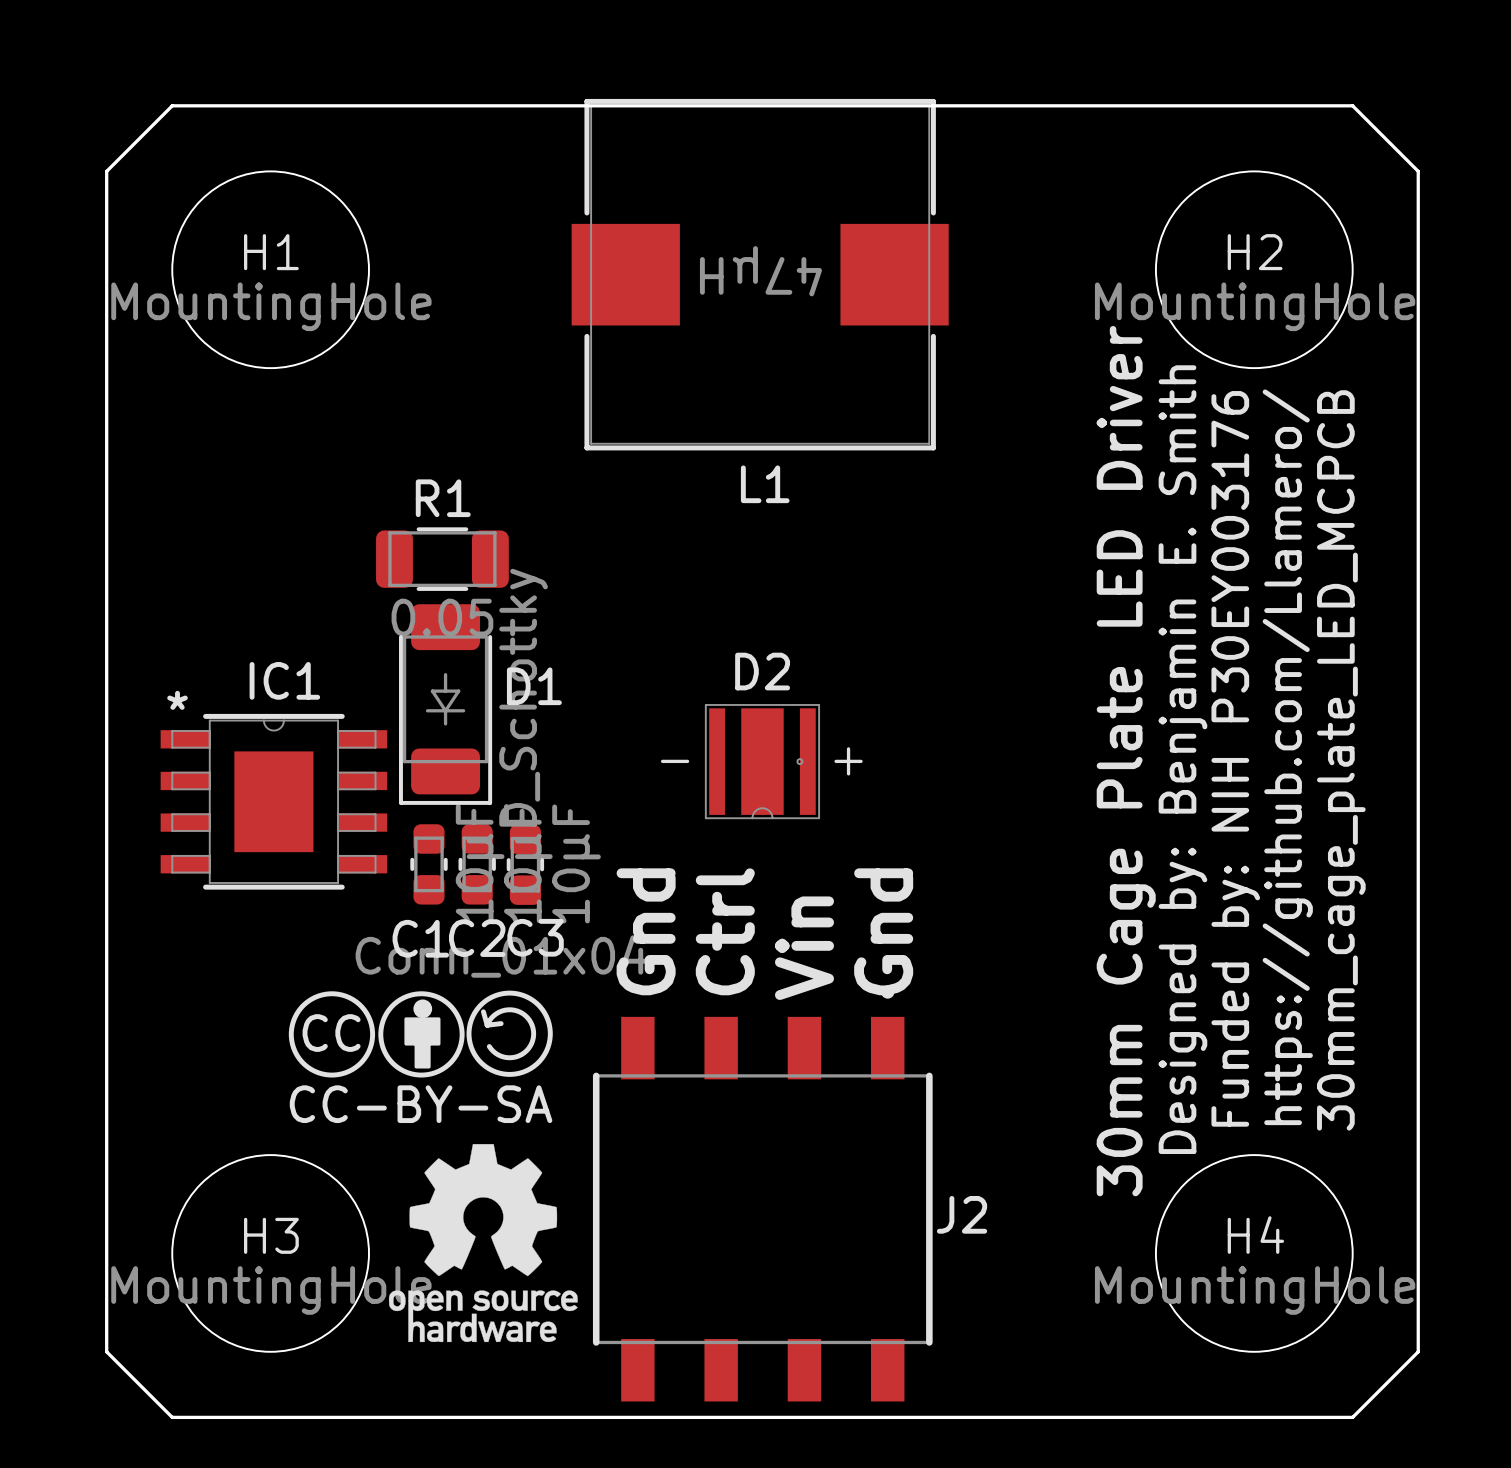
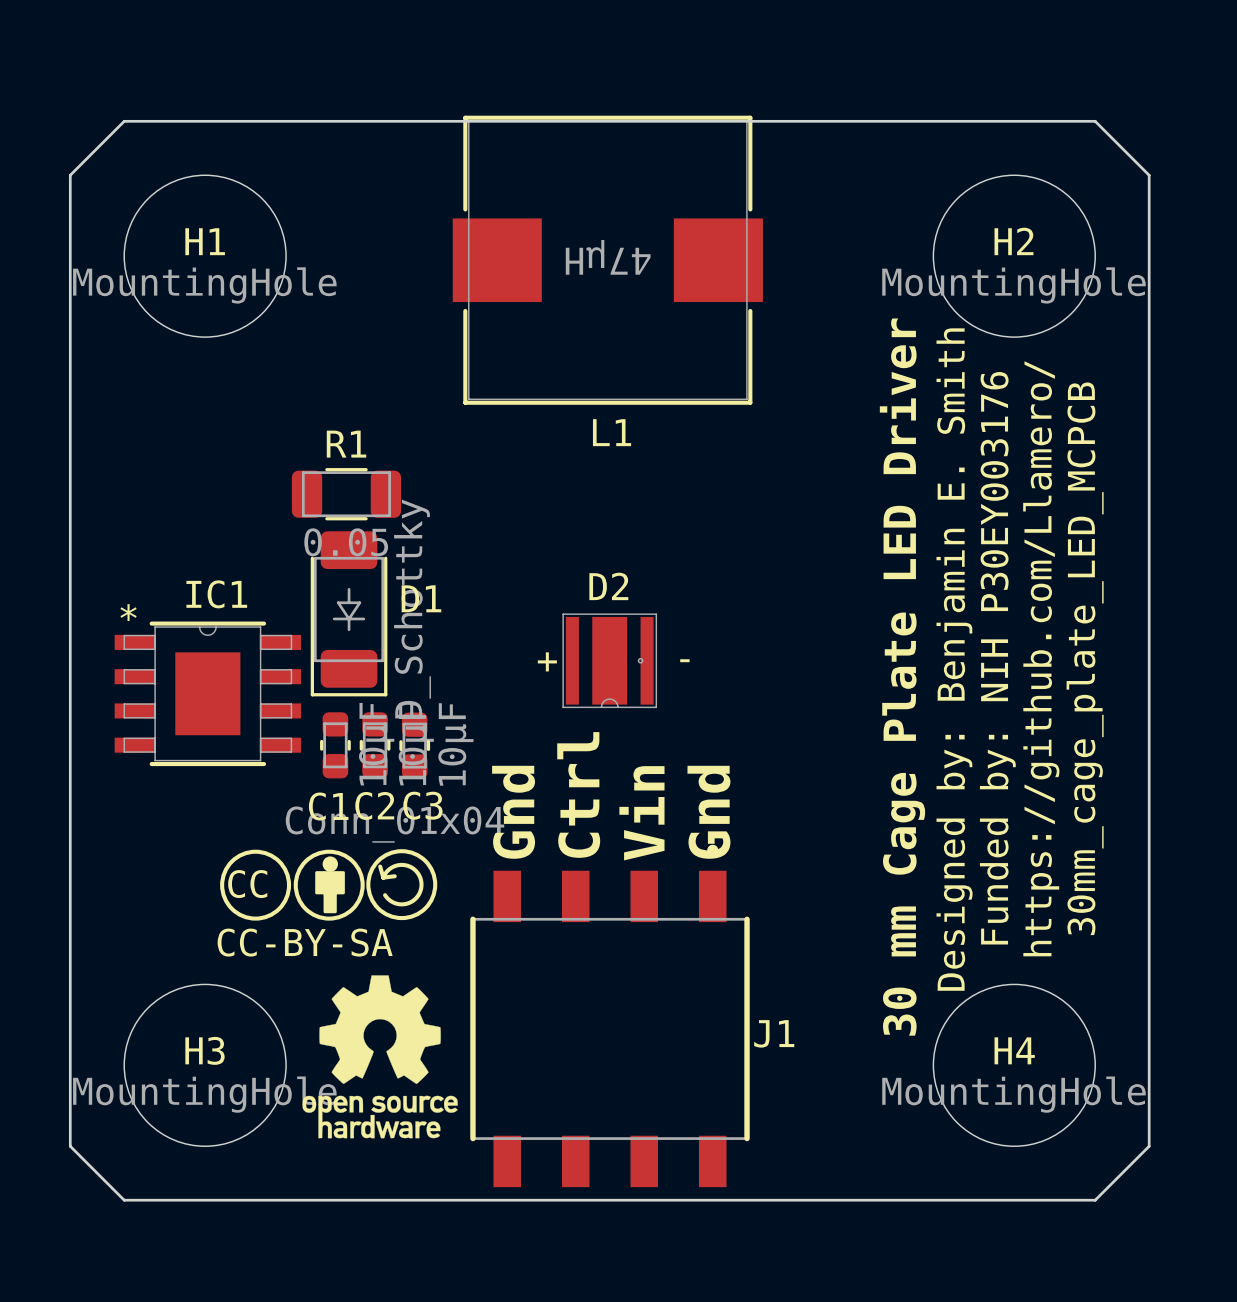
D2 text position: - (675, 761) -> - (684, 660)
D2 text position: + (848, 761) -> + (547, 661)
text: 30mm Cage Plate LED Driver (1126, 761) -> 30 mm Cage Plate LED Driver (902, 677)
J2 name: J2 (962, 1214) -> J1 (774, 1033)

